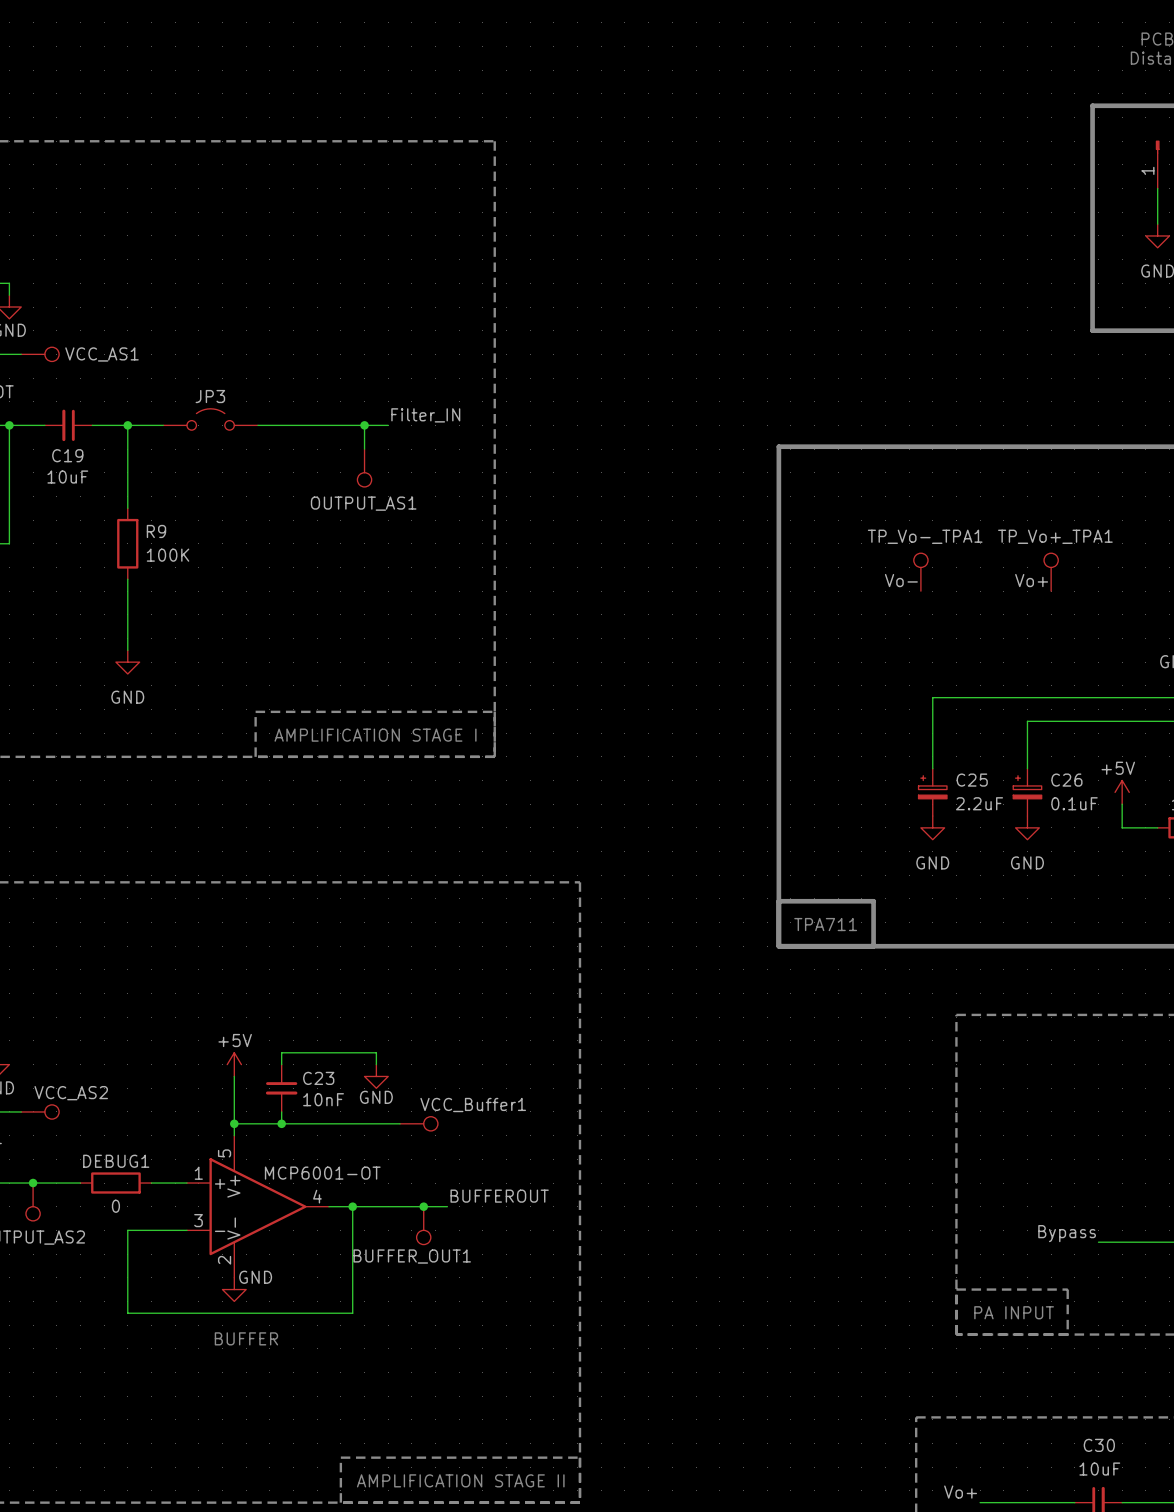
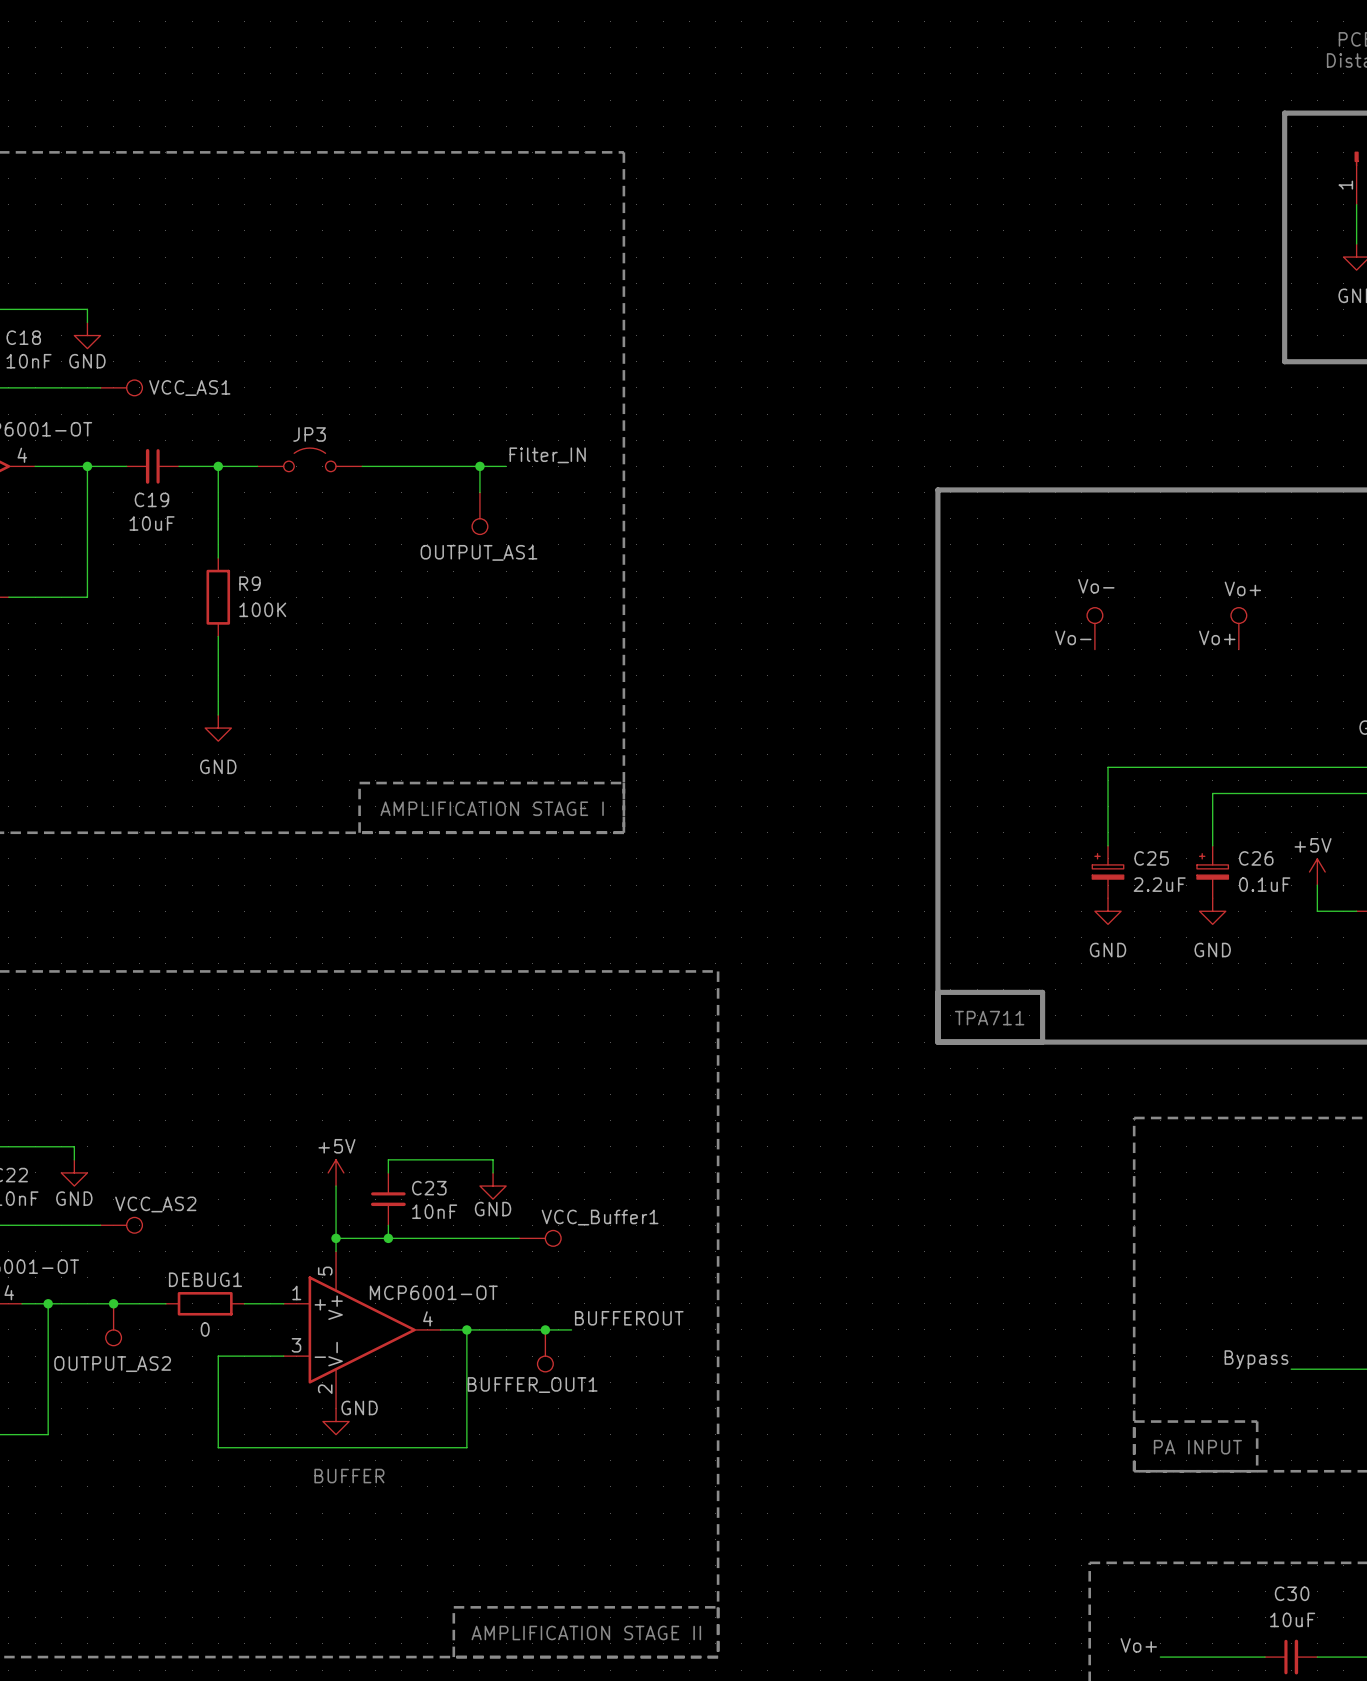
TP_Vo-_TPA1 name: TP_Vo-_TPA1 (925, 536) -> Vo- (1096, 586)
TP_Vo+_TPA1 name: TP_Vo+_TPA1 (1055, 536) -> Vo+ (1242, 588)

